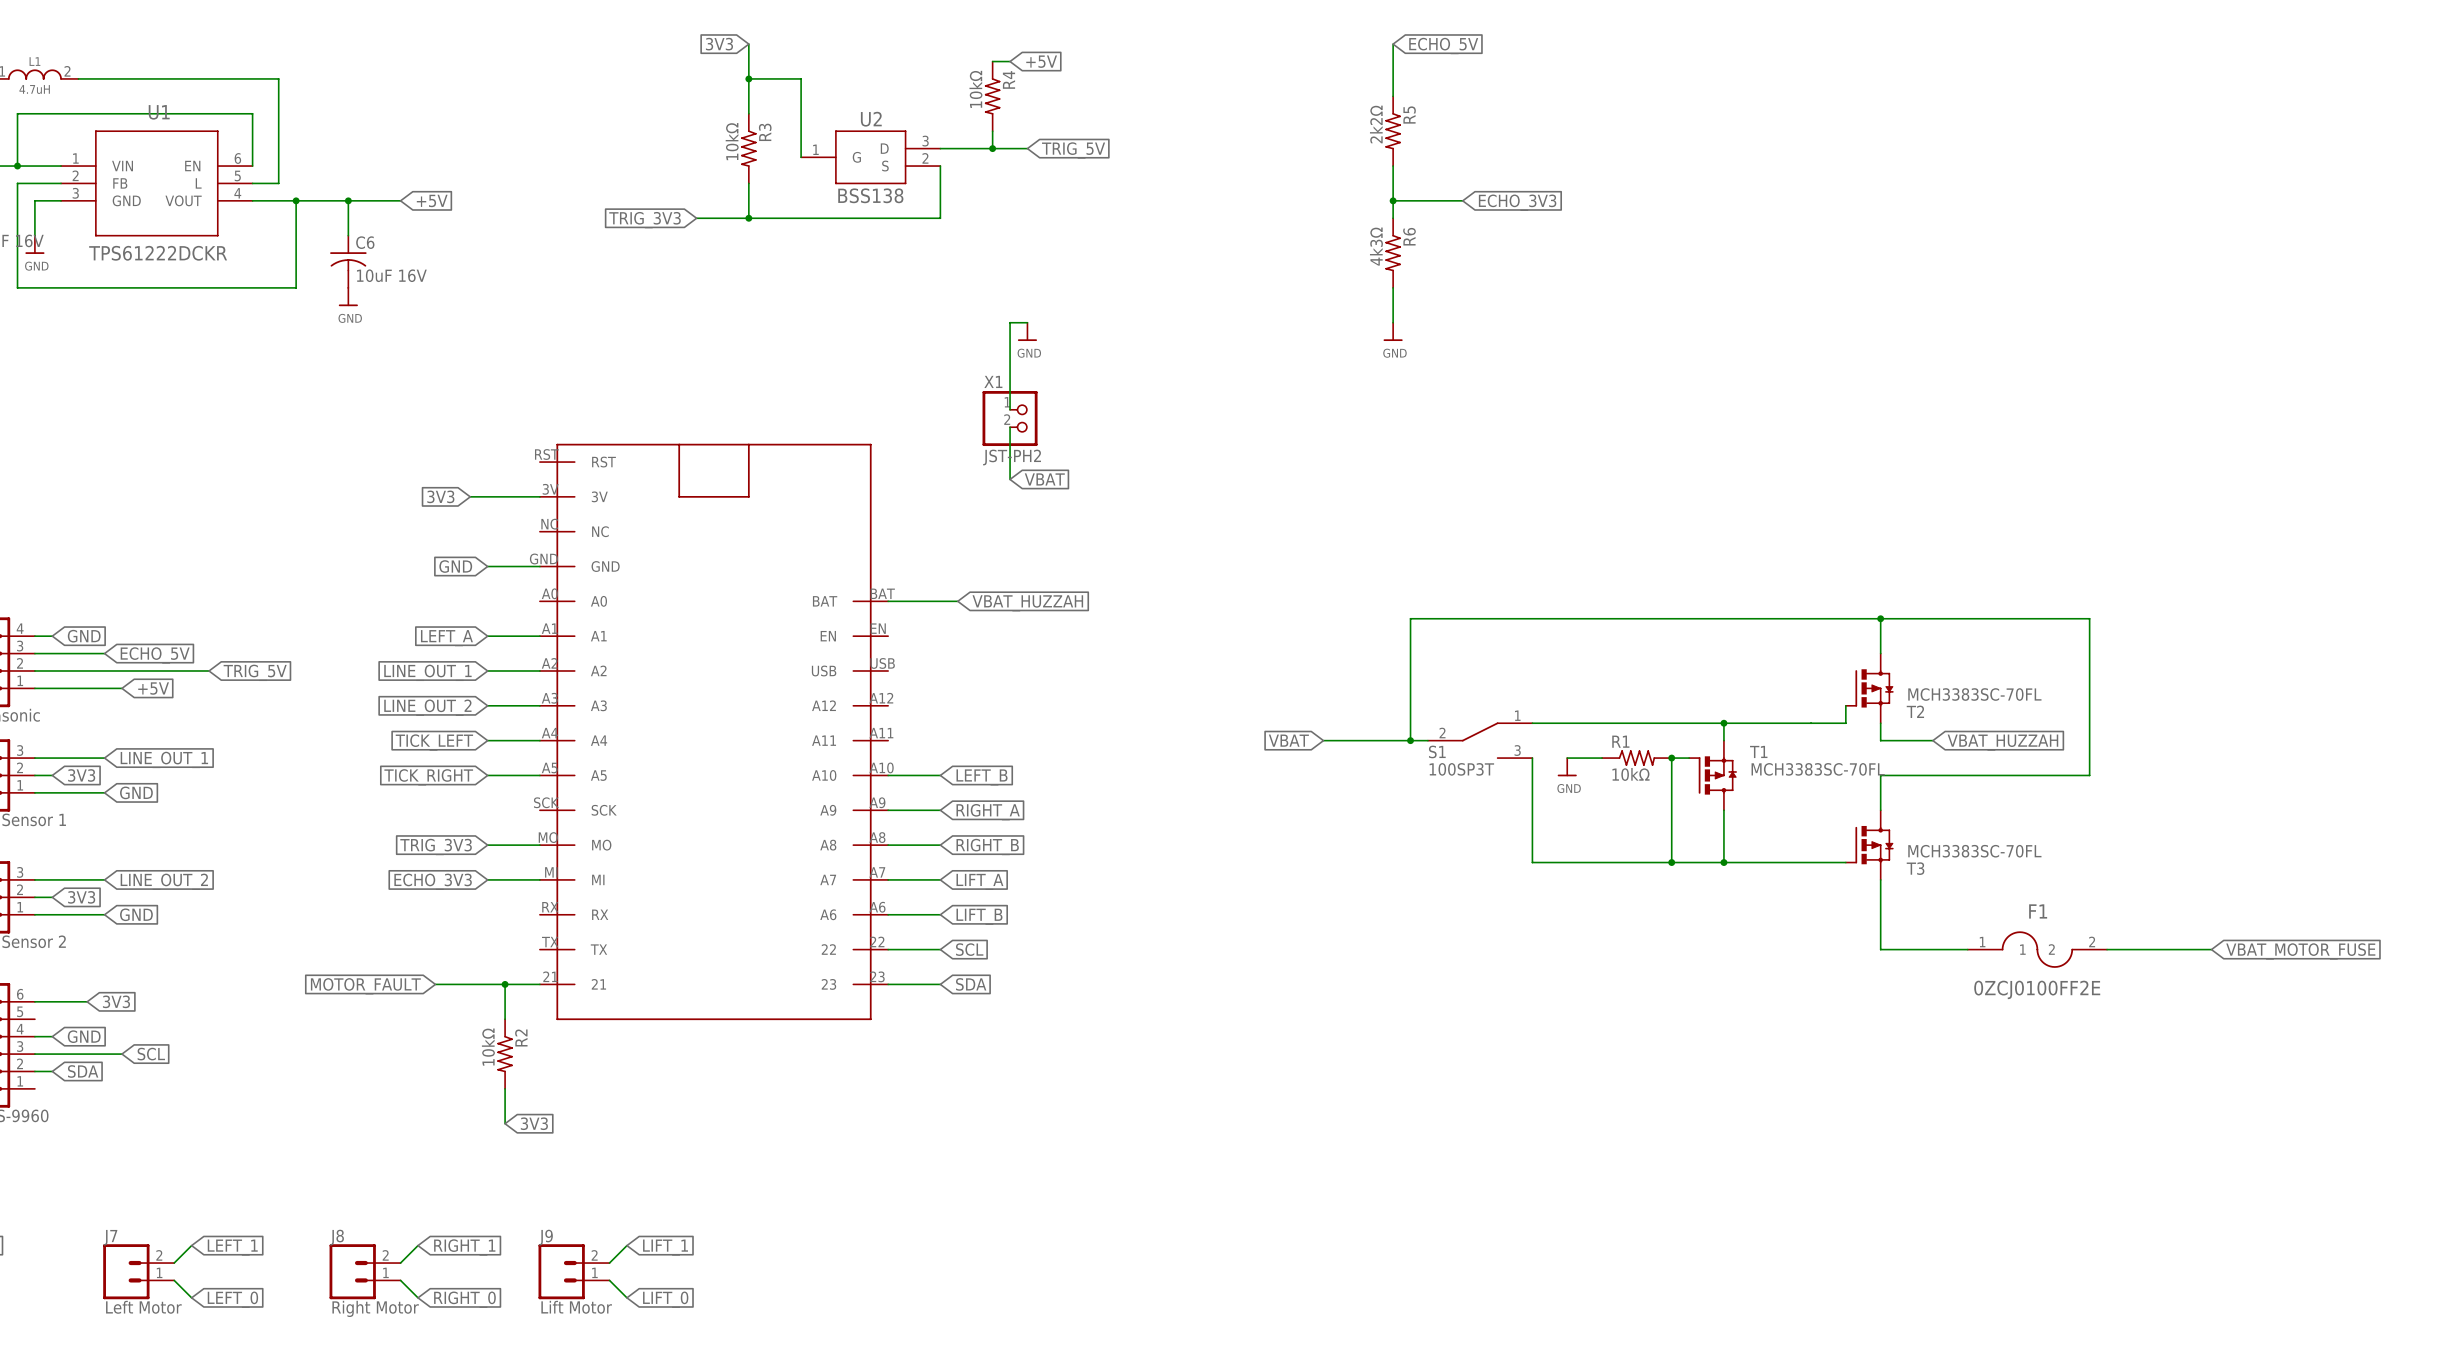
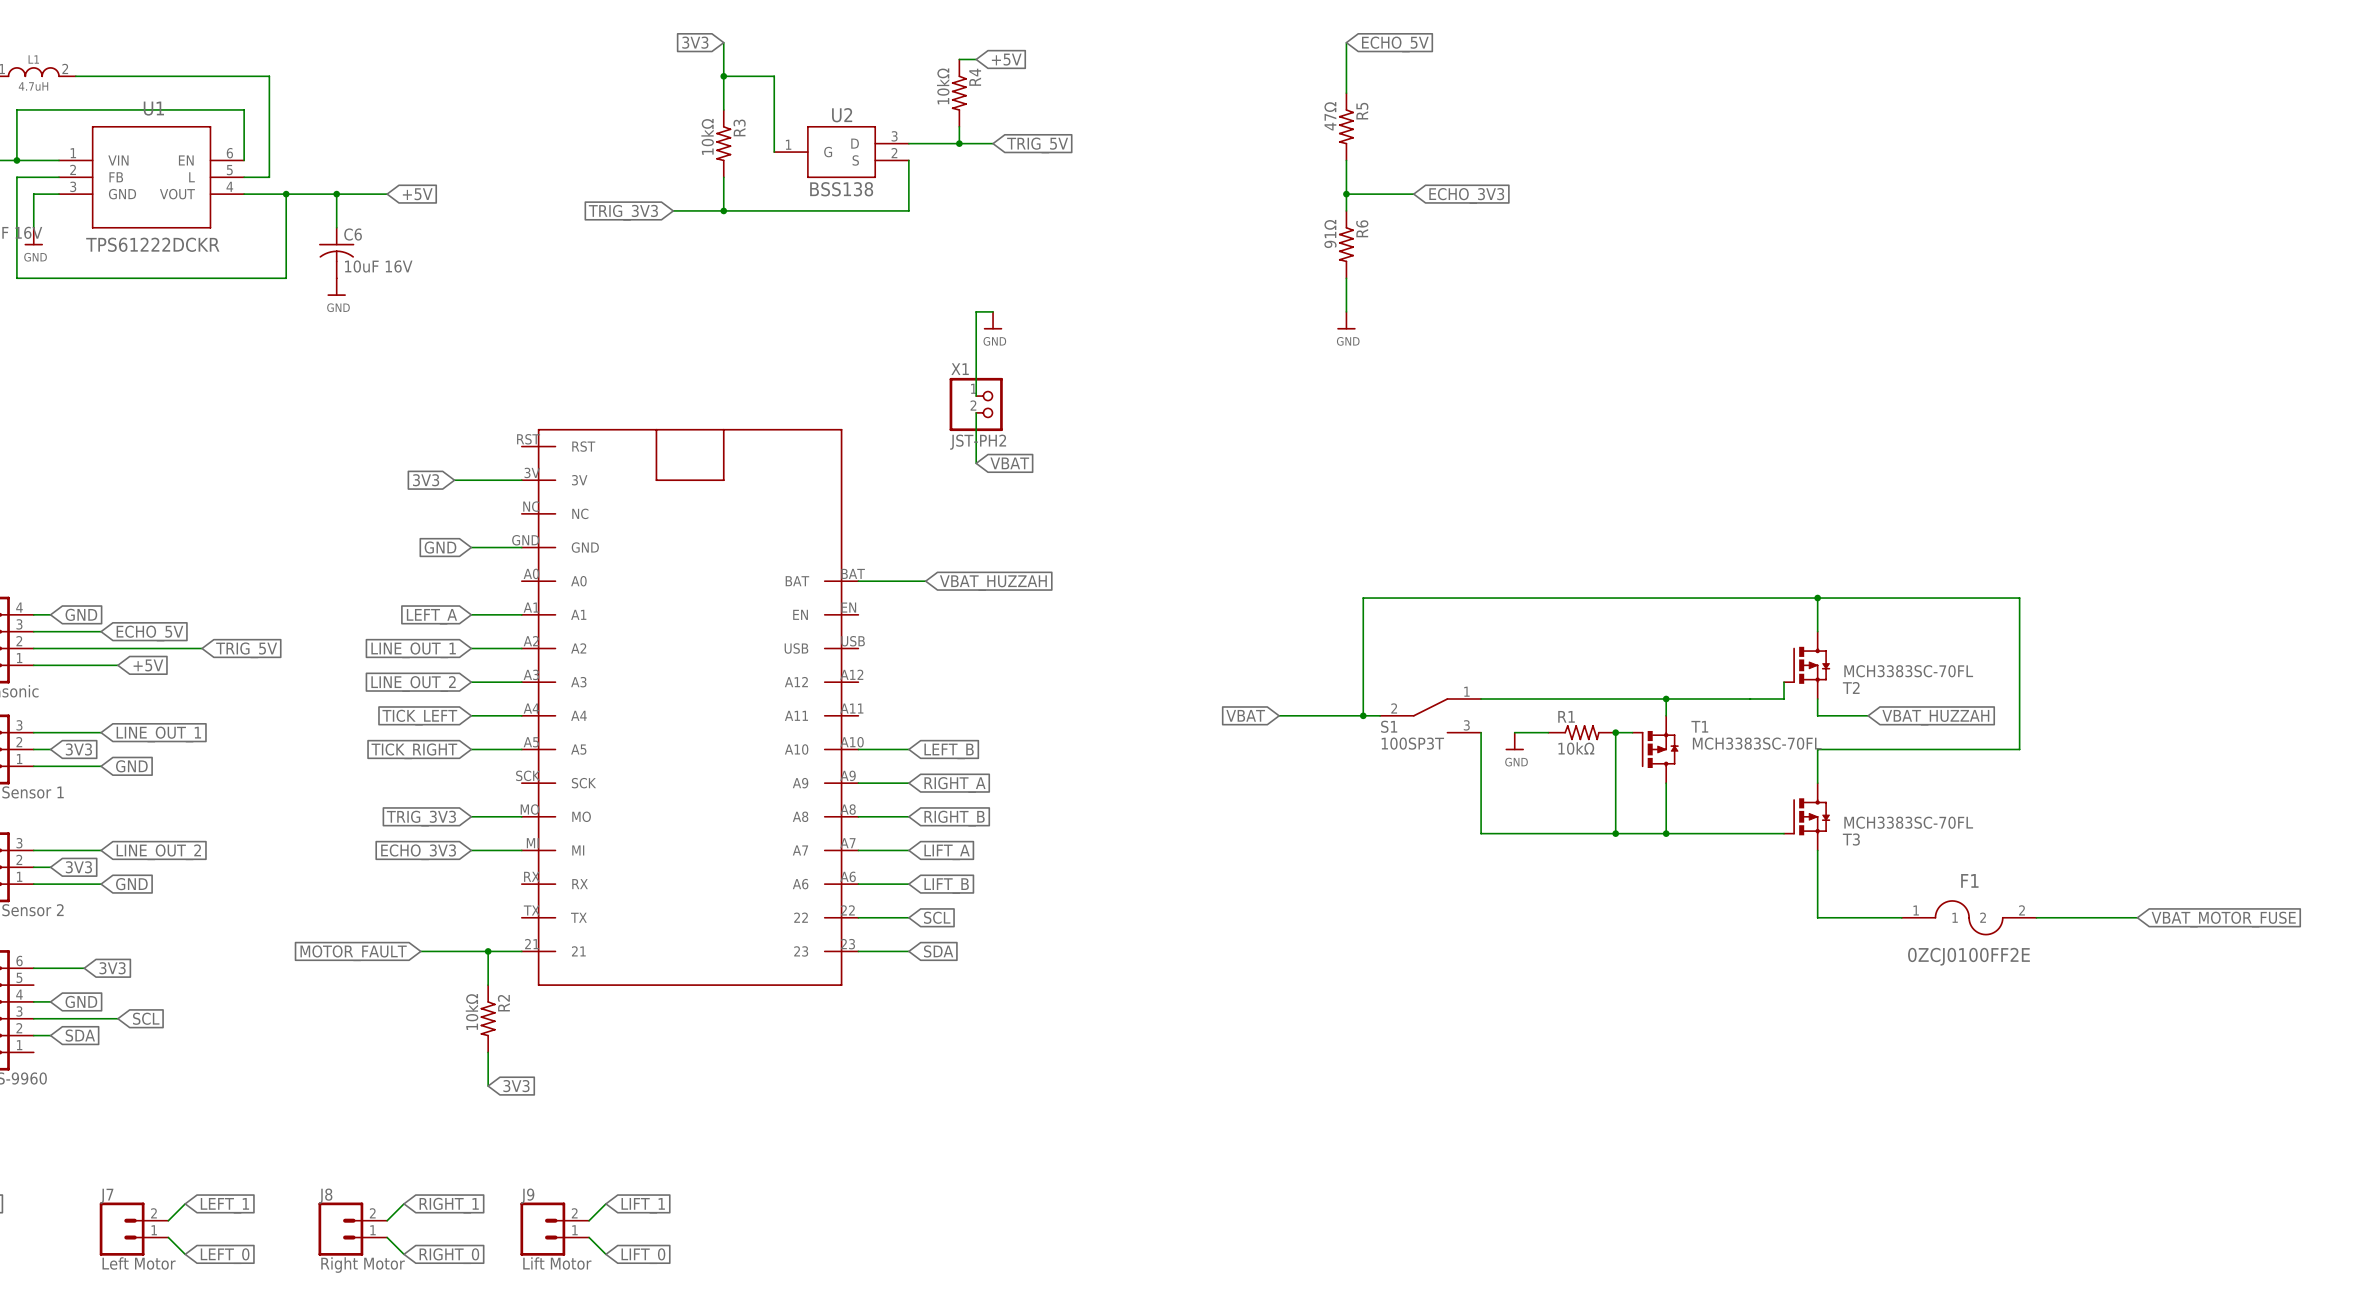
R5 value: 2k2Ω (1376, 124) -> 47Ω (1330, 116)
R6 value: 4k3Ω (1376, 246) -> 91Ω (1330, 233)

